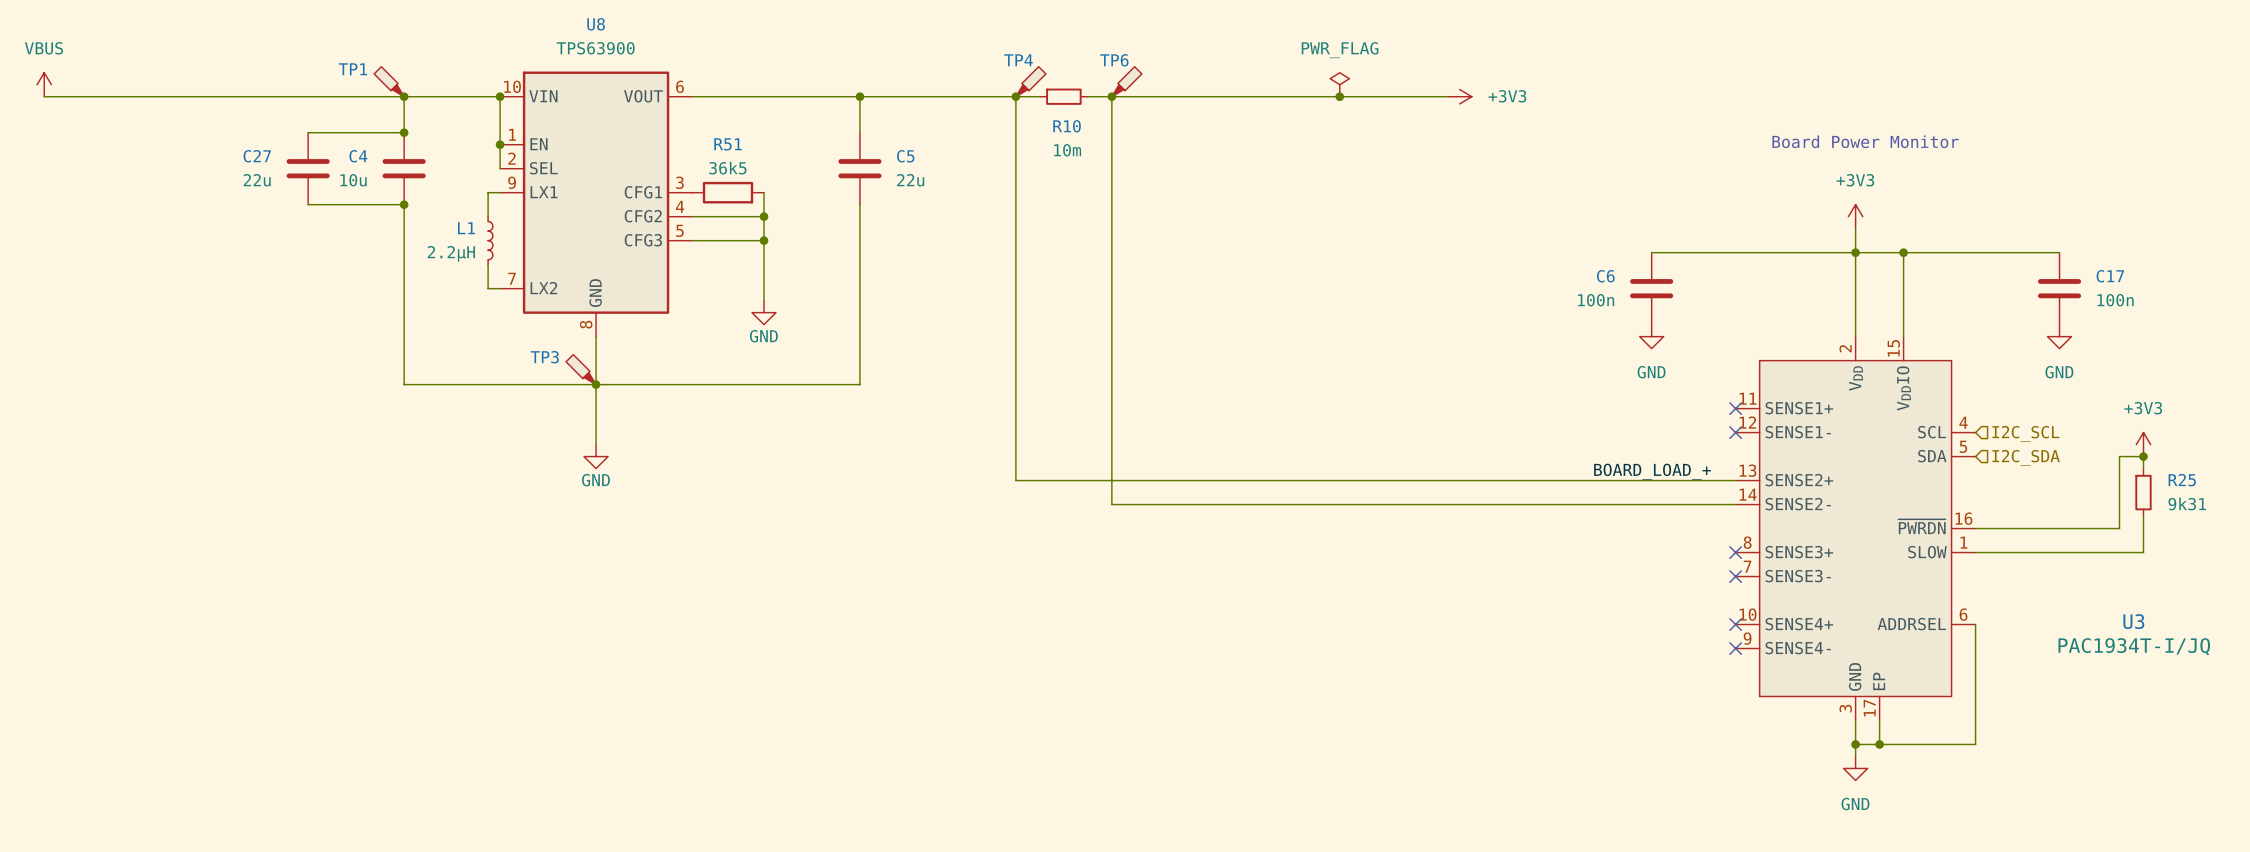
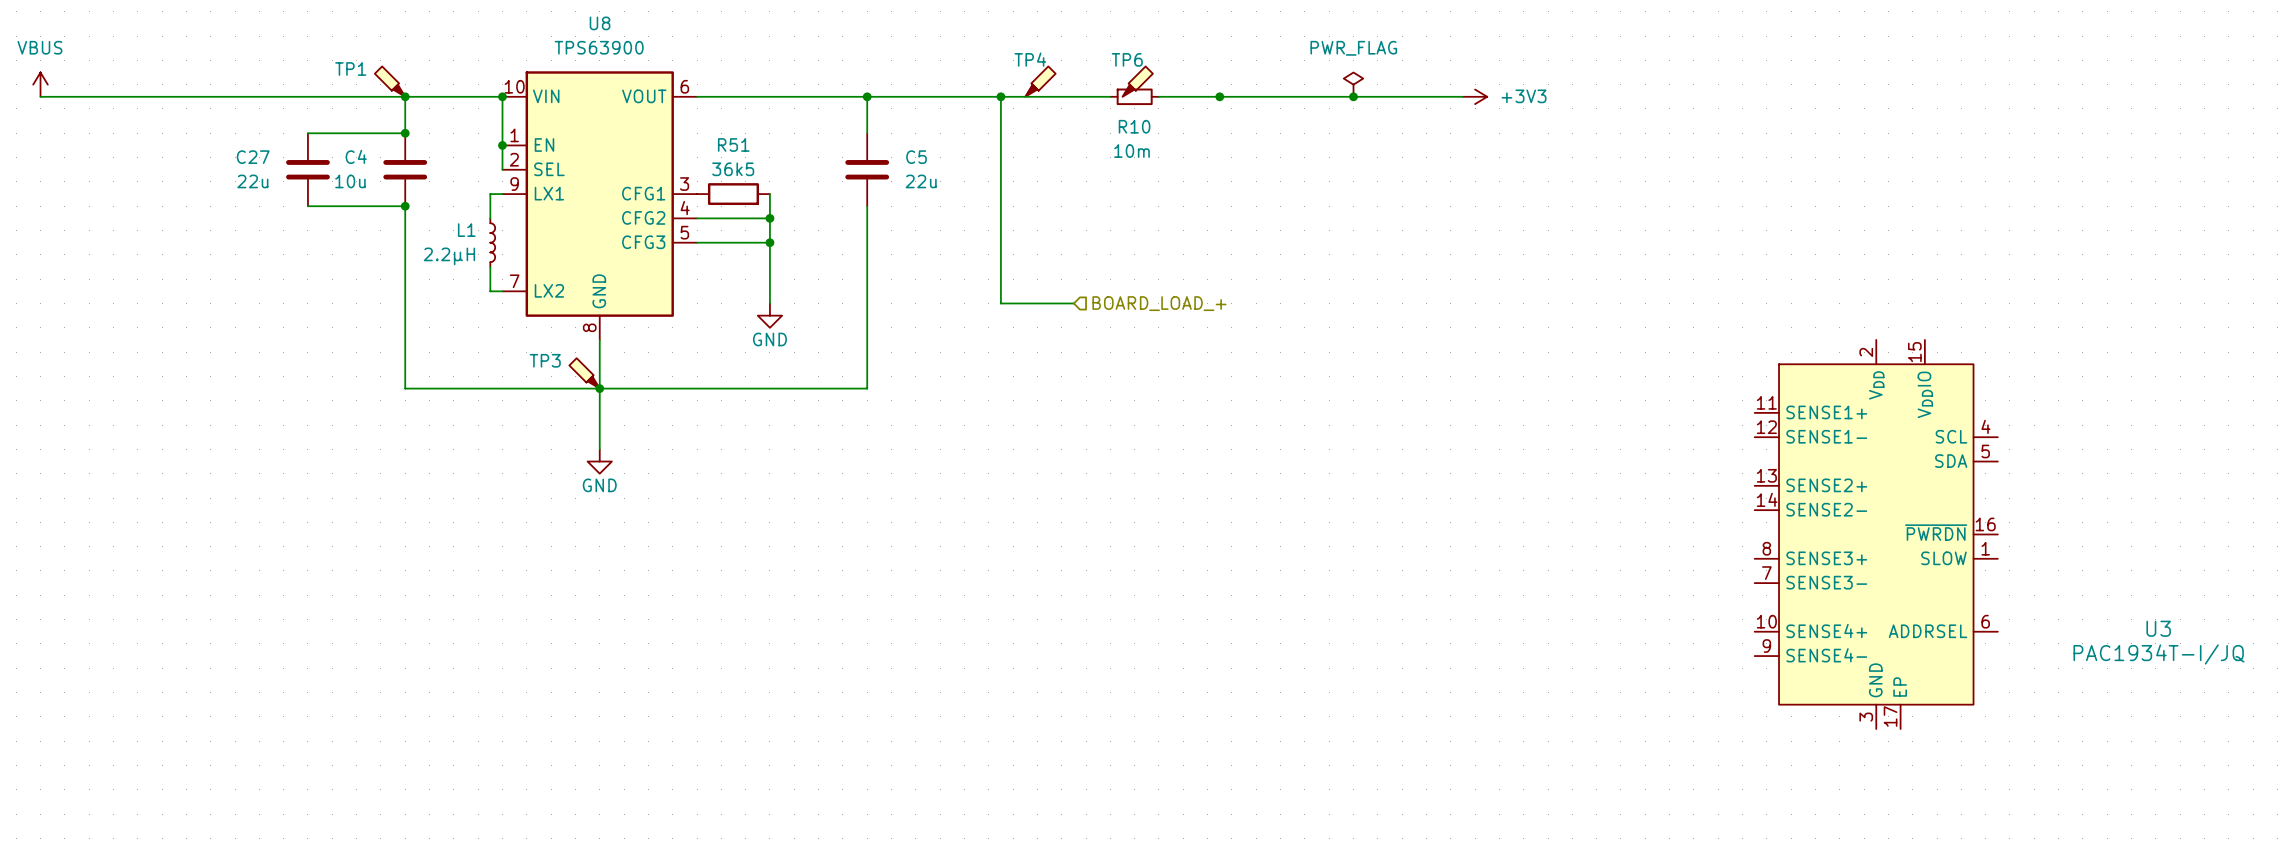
wire: none -> (1000, 96) (1000, 303) (1073, 303)
wire: (1015, 96) (1015, 480) (1735, 480) -> none
junction position: (1015, 96) -> (1000, 96)
R10 position: (1063, 96) -> (1134, 96)
wire: (1099, 96) (1147, 96) -> (1049, 96) (1098, 96)
wire: (1111, 96) (1111, 504) (1735, 504) -> none
junction: (1111, 96) -> none
junction: none -> (1219, 96)
text: Board Power Monitor (1865, 141) -> none
power symbol: +3V3 (1855, 216) -> none
wire: (1855, 228) (1855, 336) -> none
wire: (1651, 252) (2059, 252) -> none
junction: (1855, 252) -> none
wire: (1903, 252) (1903, 336) -> none
junction: (1903, 252) -> none
C6: 100n (1651, 288) -> none
C17: 100n (2059, 288) -> none
hierarchical label: none -> BOARD_LOAD_+ (1159, 303)
power symbol: GND (1651, 336) -> none
power symbol: GND (2059, 336) -> none
no-connect mark: (1735, 408) -> none
no-connect mark: (1735, 432) -> none
hierarchical label: I2C_SCL (2025, 433) -> none
power symbol: +3V3 (2143, 444) -> none
junction: (2143, 456) -> none
hierarchical label: I2C_SDA (2026, 457) -> none
wire: (2143, 468) (2143, 456) (2119, 456) (2119, 528) (1975, 528) -> none
label: BOARD_LOAD_+ (1652, 471) -> none
R25: 9k31 (2143, 492) -> none
wire: (2143, 516) (2143, 552) (1975, 552) -> none
no-connect mark: (1735, 552) -> none
no-connect mark: (1735, 576) -> none
no-connect mark: (1735, 624) -> none
wire: (1975, 624) (1975, 744) (1855, 744) -> none
no-connect mark: (1735, 648) -> none
wire: (1855, 720) (1855, 756) -> none
wire: (1879, 720) (1879, 744) -> none
junction: (1855, 744) -> none
junction: (1879, 744) -> none
power symbol: GND (1855, 768) -> none

